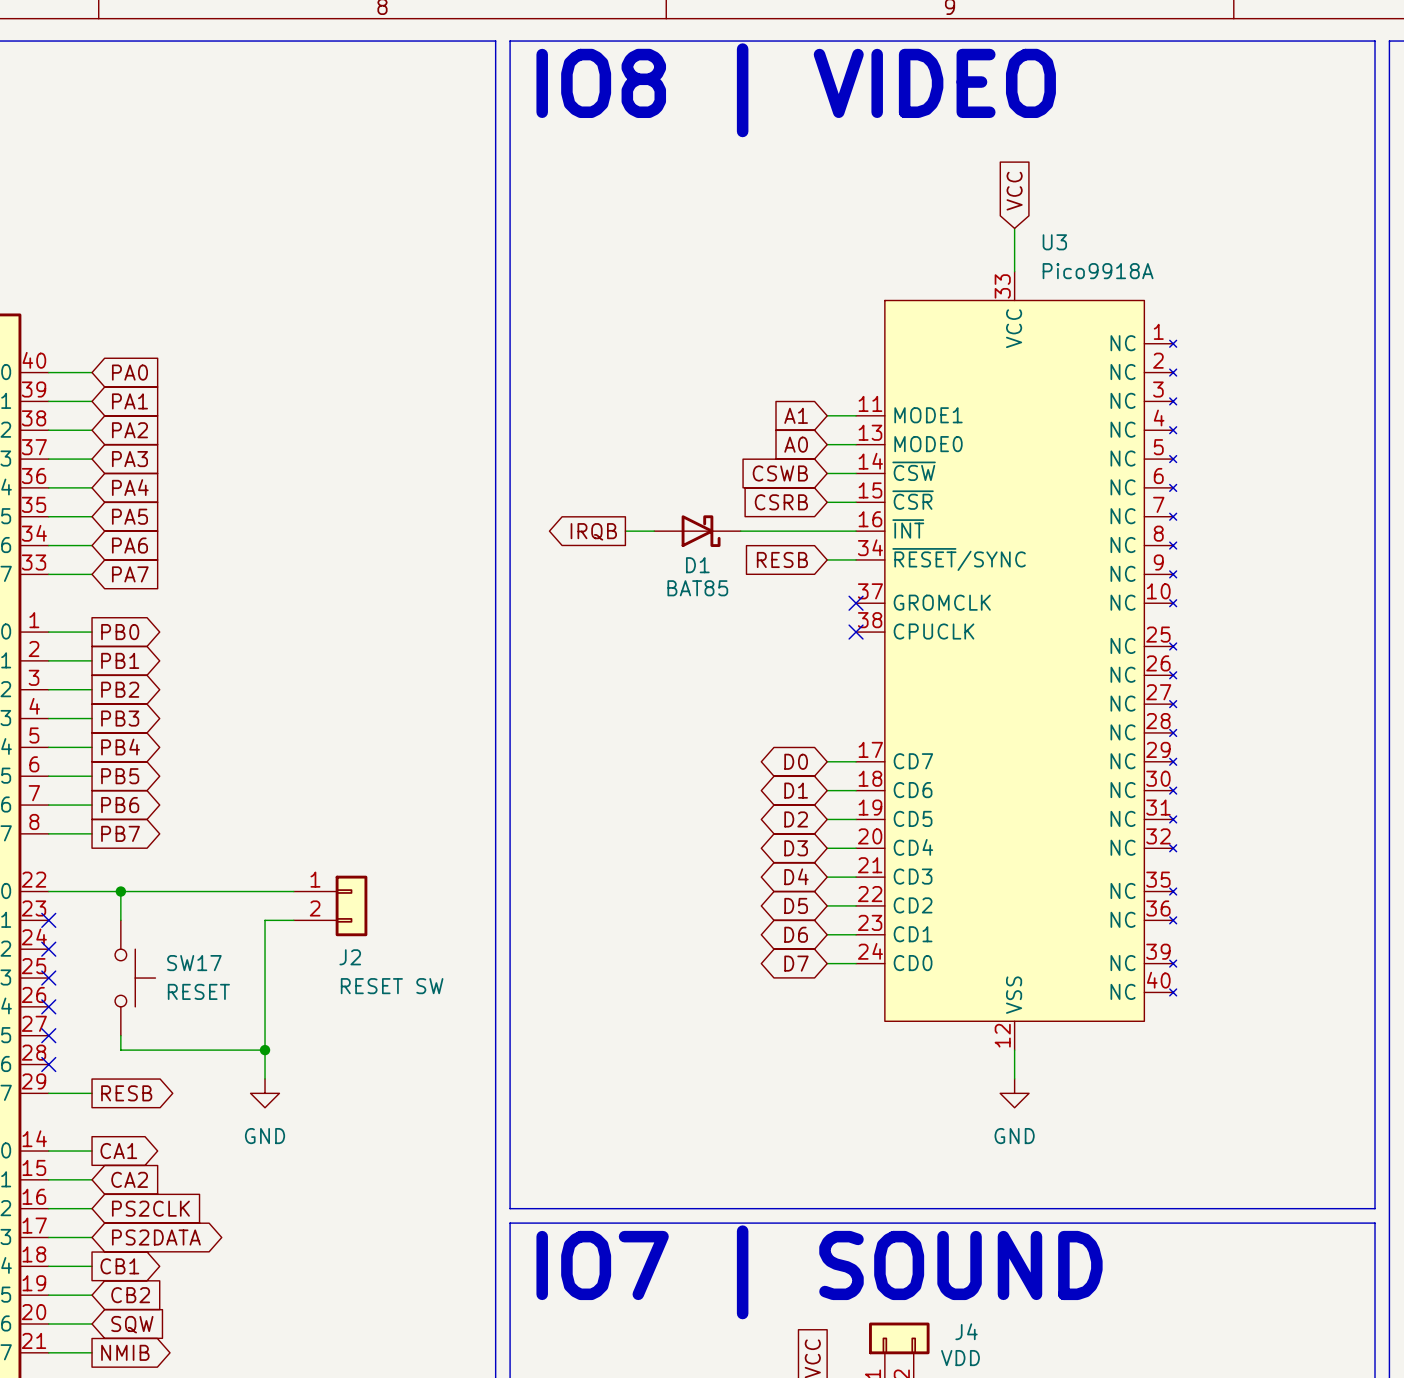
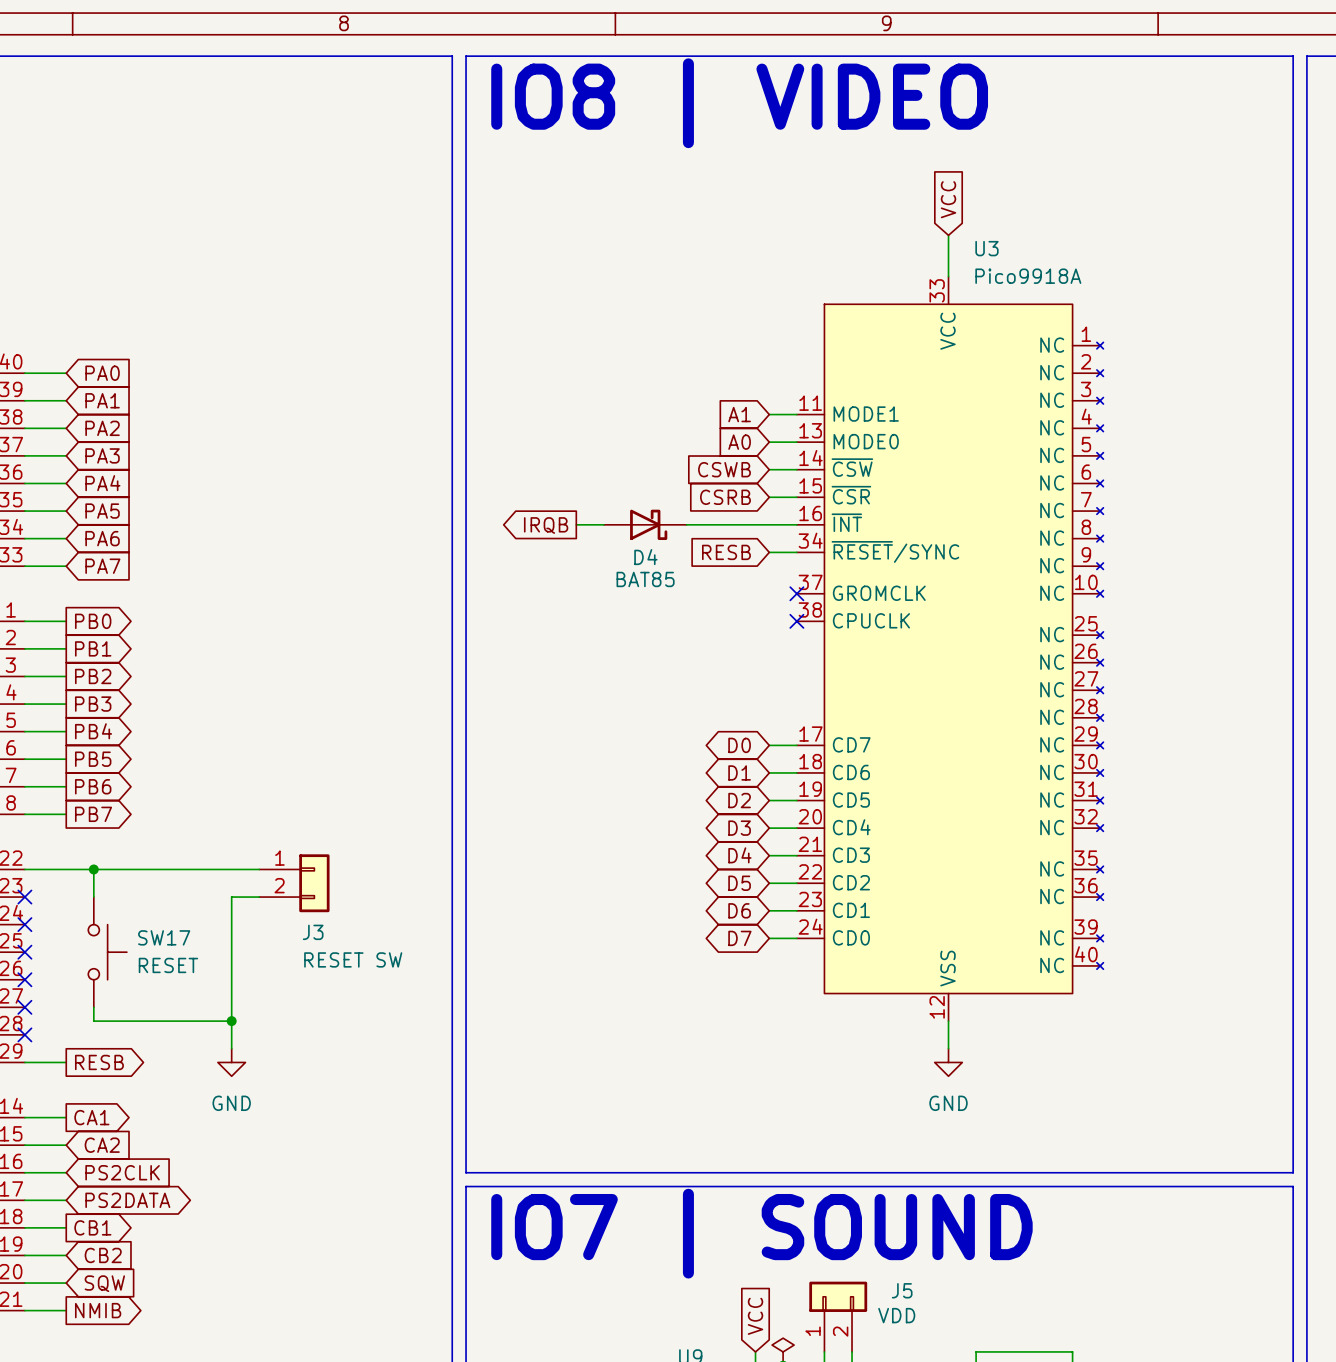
D1 name: D1 (697, 565) -> D4 (645, 557)
J2 name: J2 (350, 957) -> J3 (313, 932)
J4 name: J4 (966, 1331) -> J5 (902, 1290)

